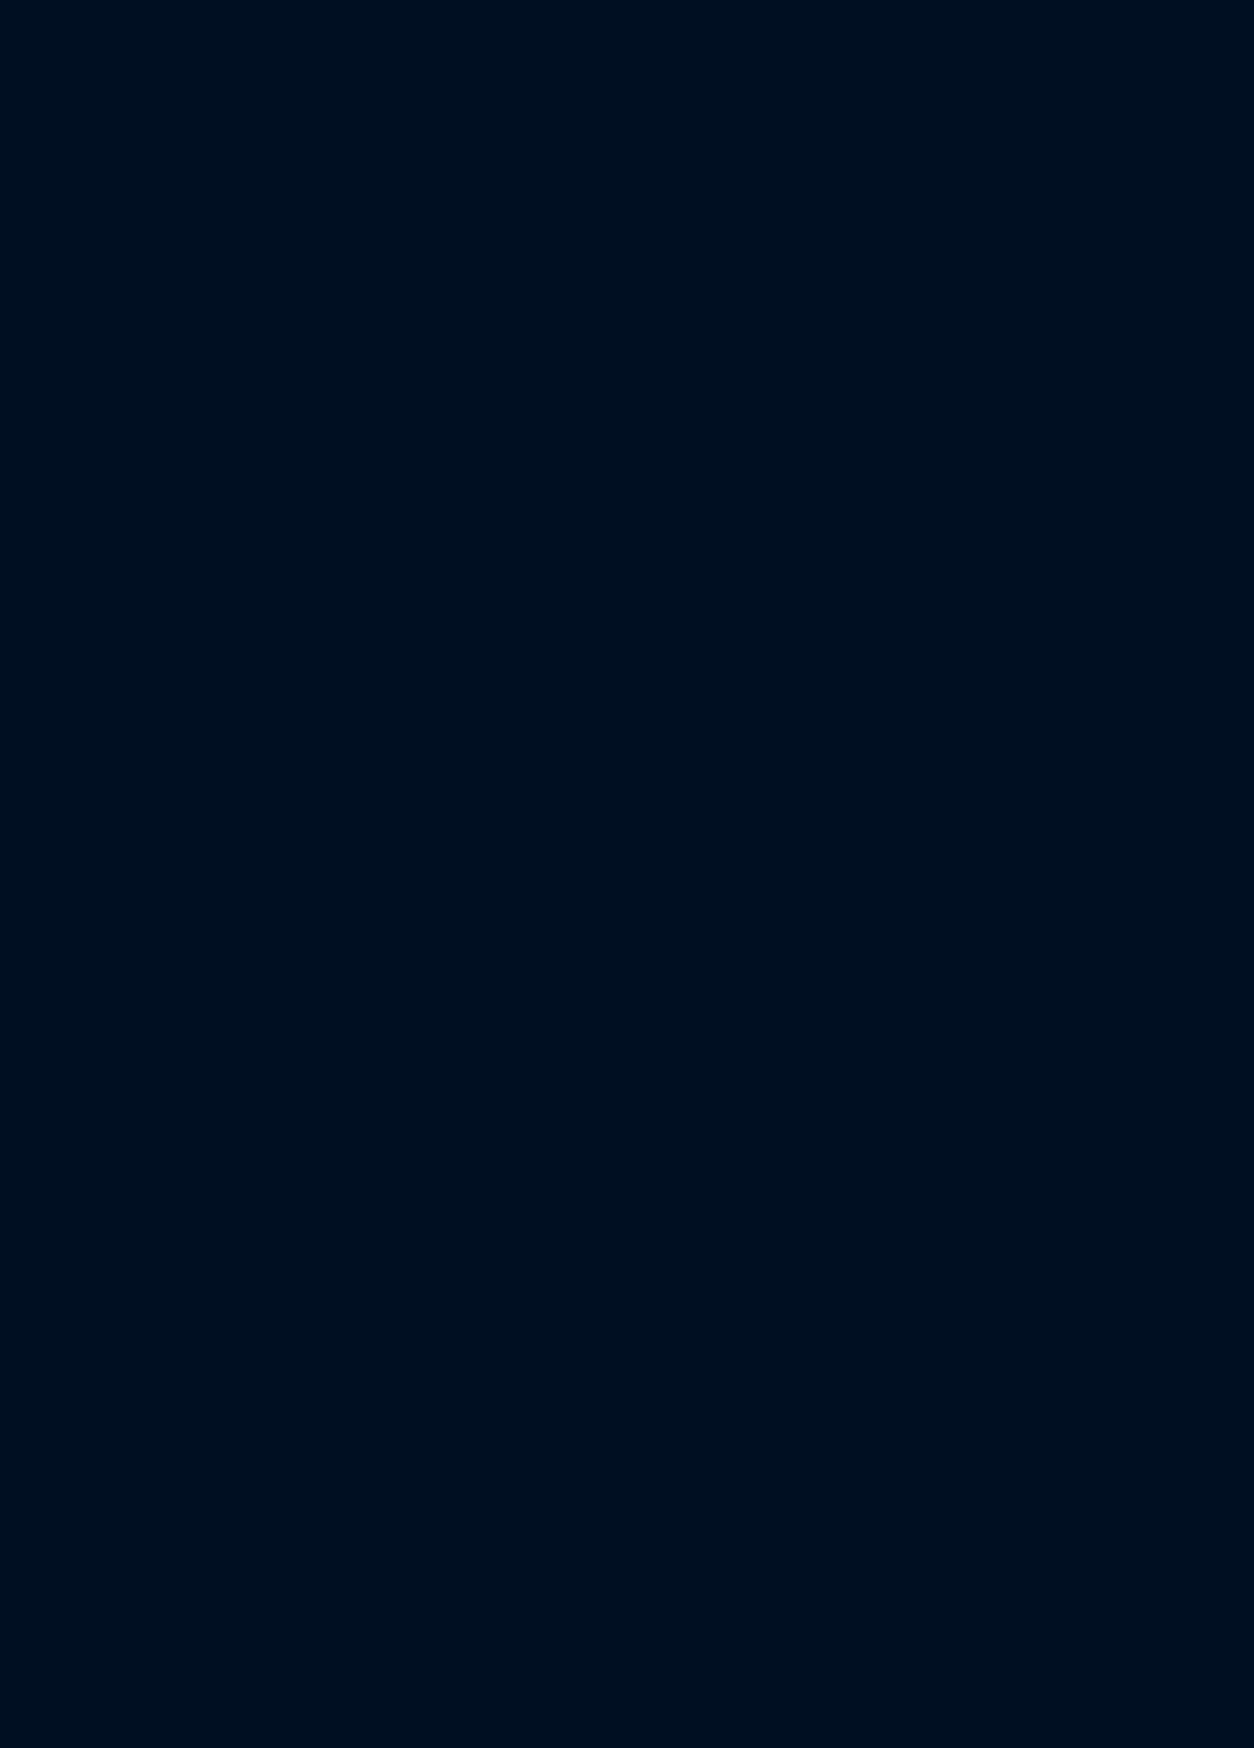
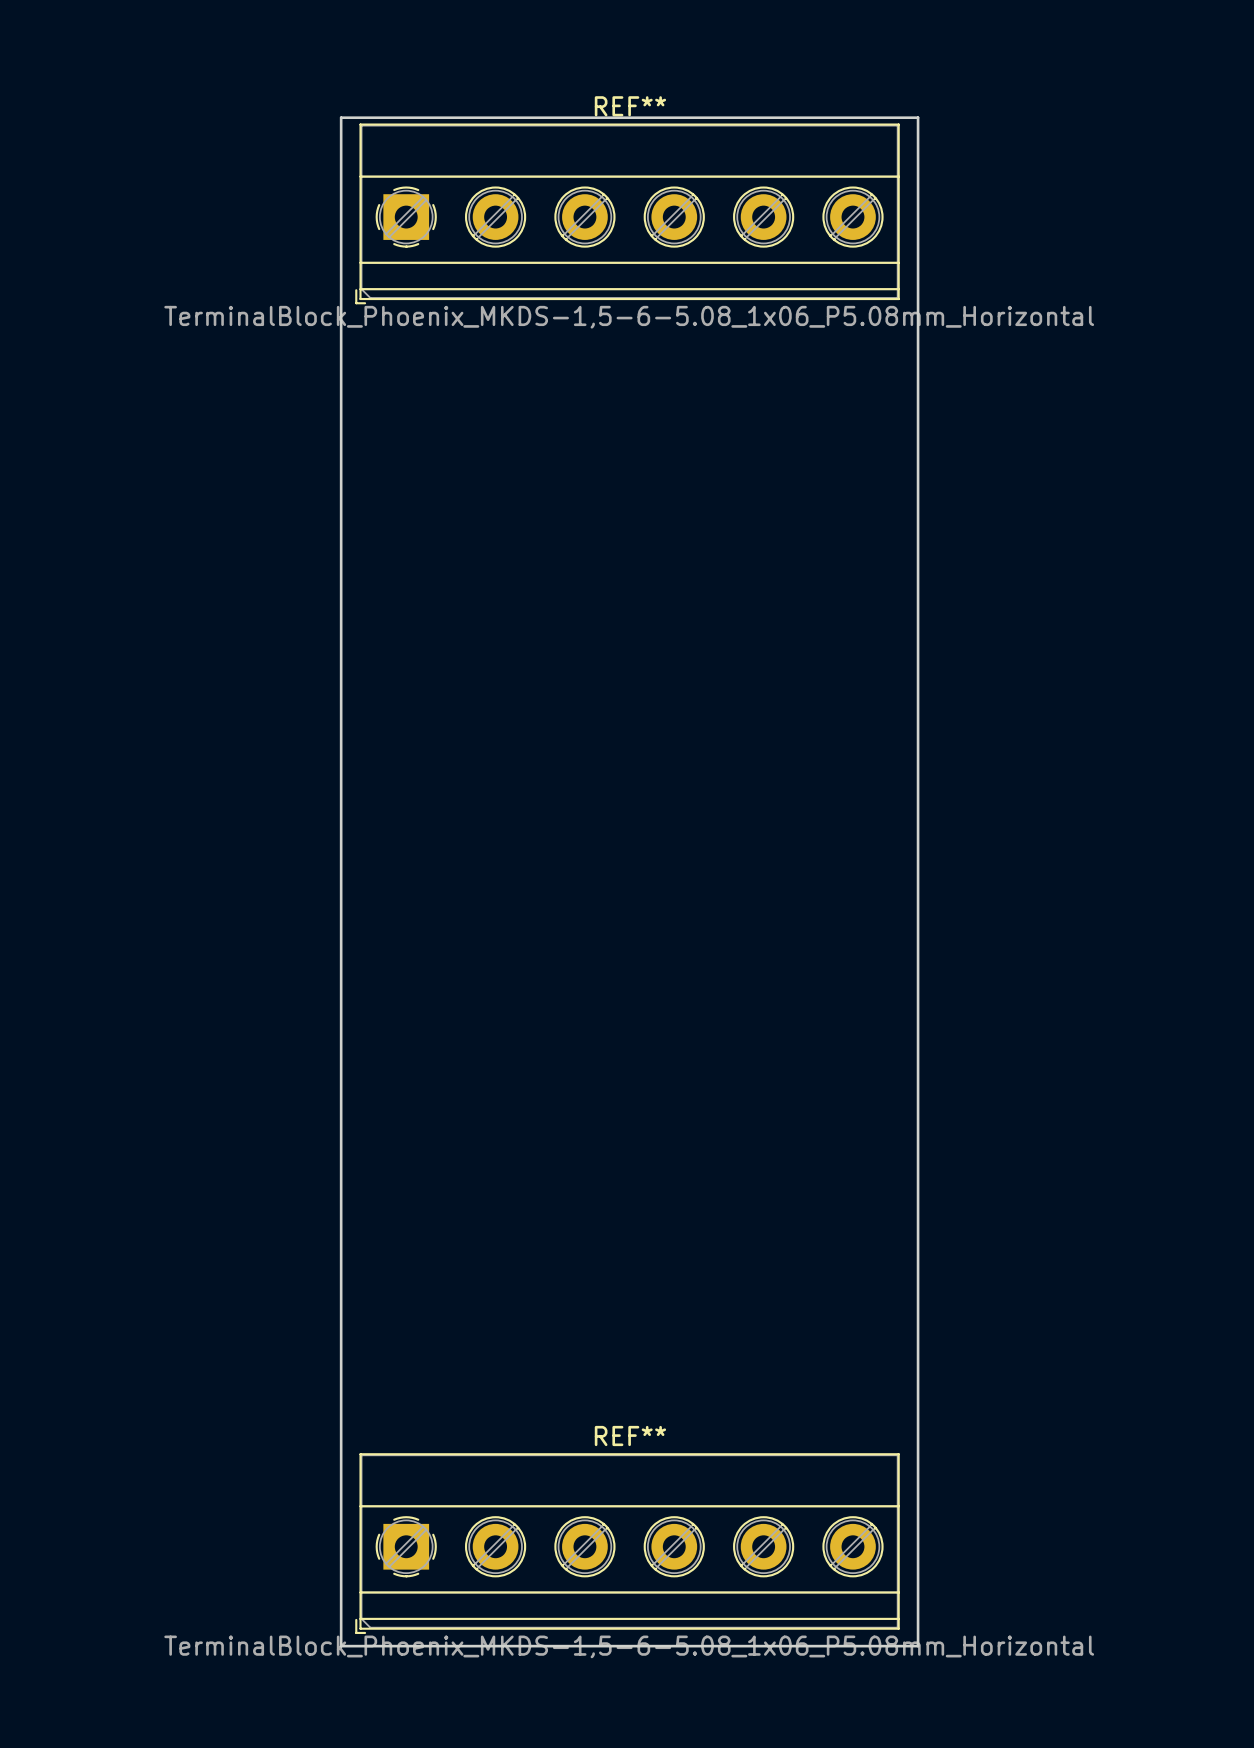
board edge: none -> (341, 117) (341, 1646) (918, 1646) (918, 117) (341, 117)
REF**: none -> TerminalBlock_Phoenix_MKDS-1,5-6-5.08_1x06_P5.08mm_Horizontal (627, 213)
REF**: none -> TerminalBlock_Phoenix_MKDS-1,5-6-5.08_1x06_P5.08mm_Horizontal (627, 1543)

